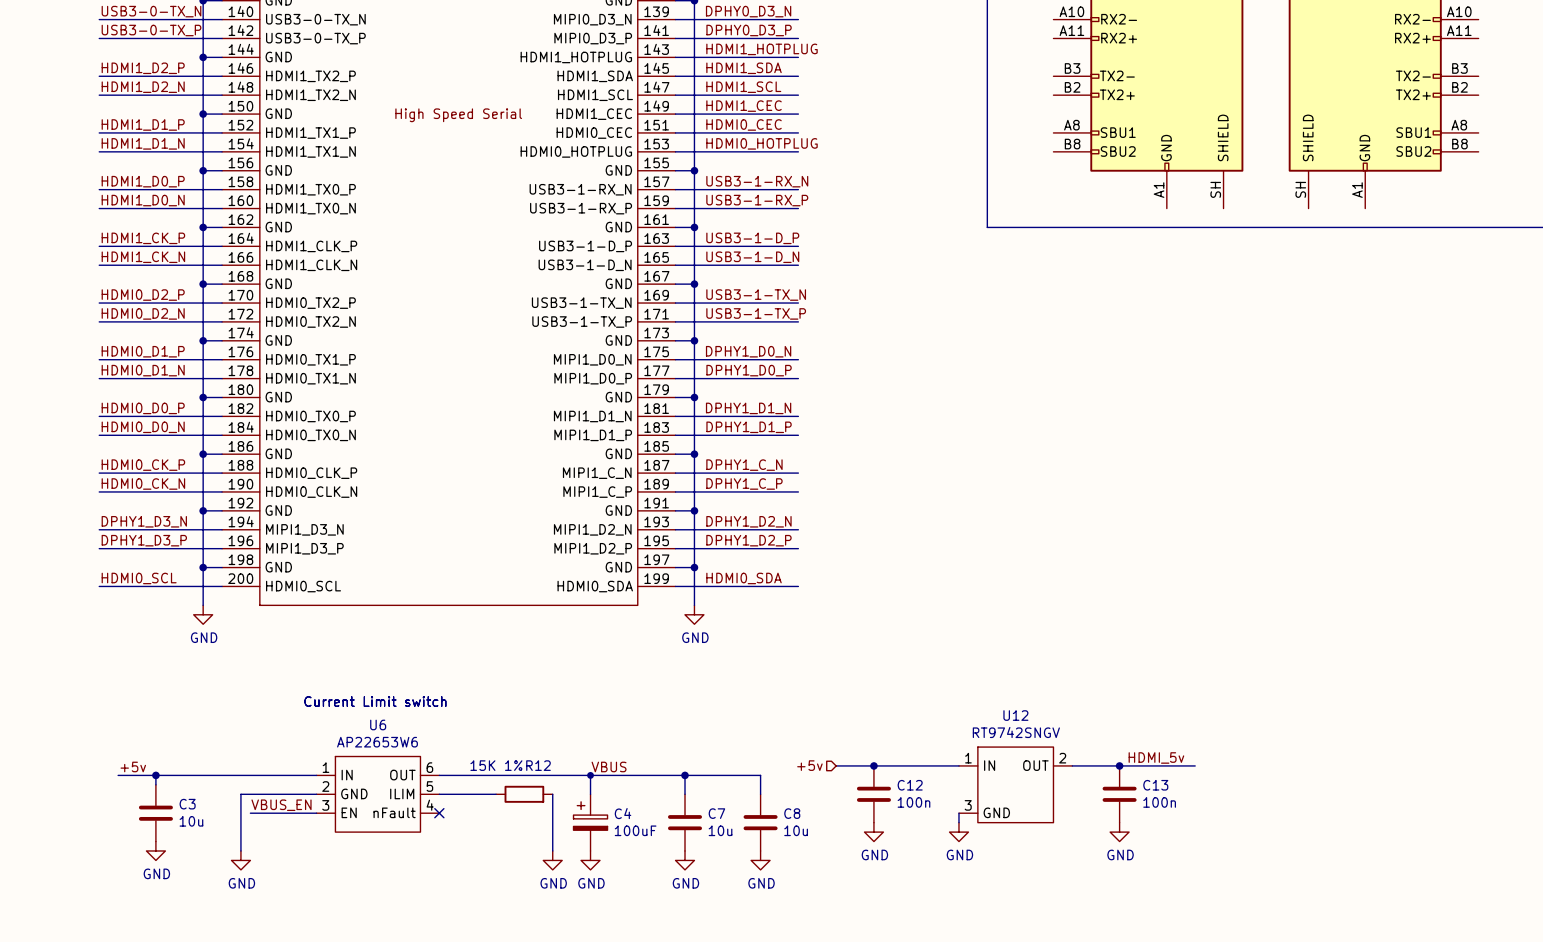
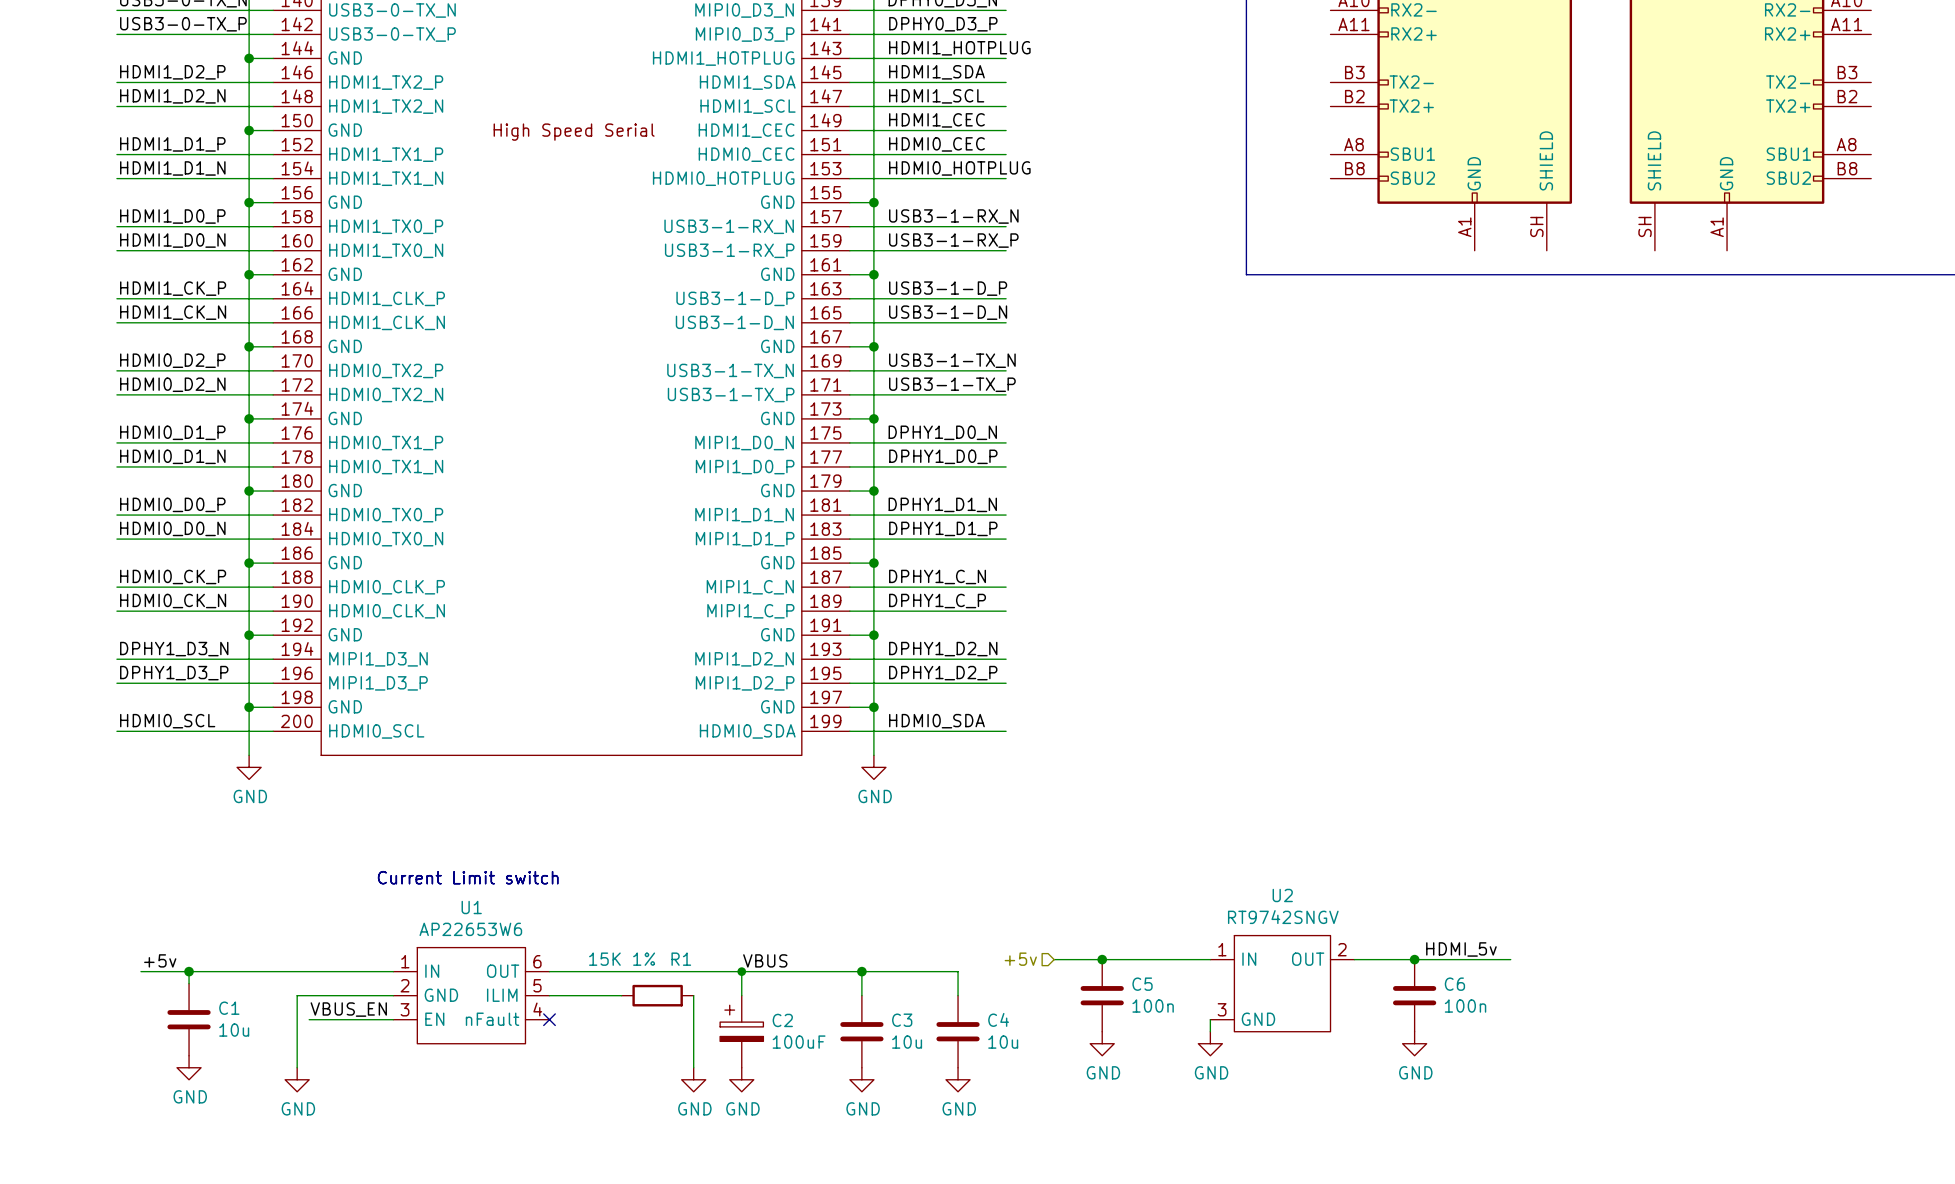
U12 name: U12 (1015, 715) -> U2 (1282, 895)
U6 name: U6 (378, 724) -> U1 (471, 907)
R12 name: R12 (538, 765) -> R1 (681, 959)
C12 name: C12 (910, 785) -> C5 (1142, 984)
C13 name: C13 (1155, 785) -> C6 (1454, 984)
C3 name: C3 (187, 804) -> C1 (229, 1008)
C4 name: C4 (623, 813) -> C2 (782, 1020)
C7 name: C7 (716, 813) -> C3 (902, 1020)
C8 name: C8 (792, 813) -> C4 (998, 1019)

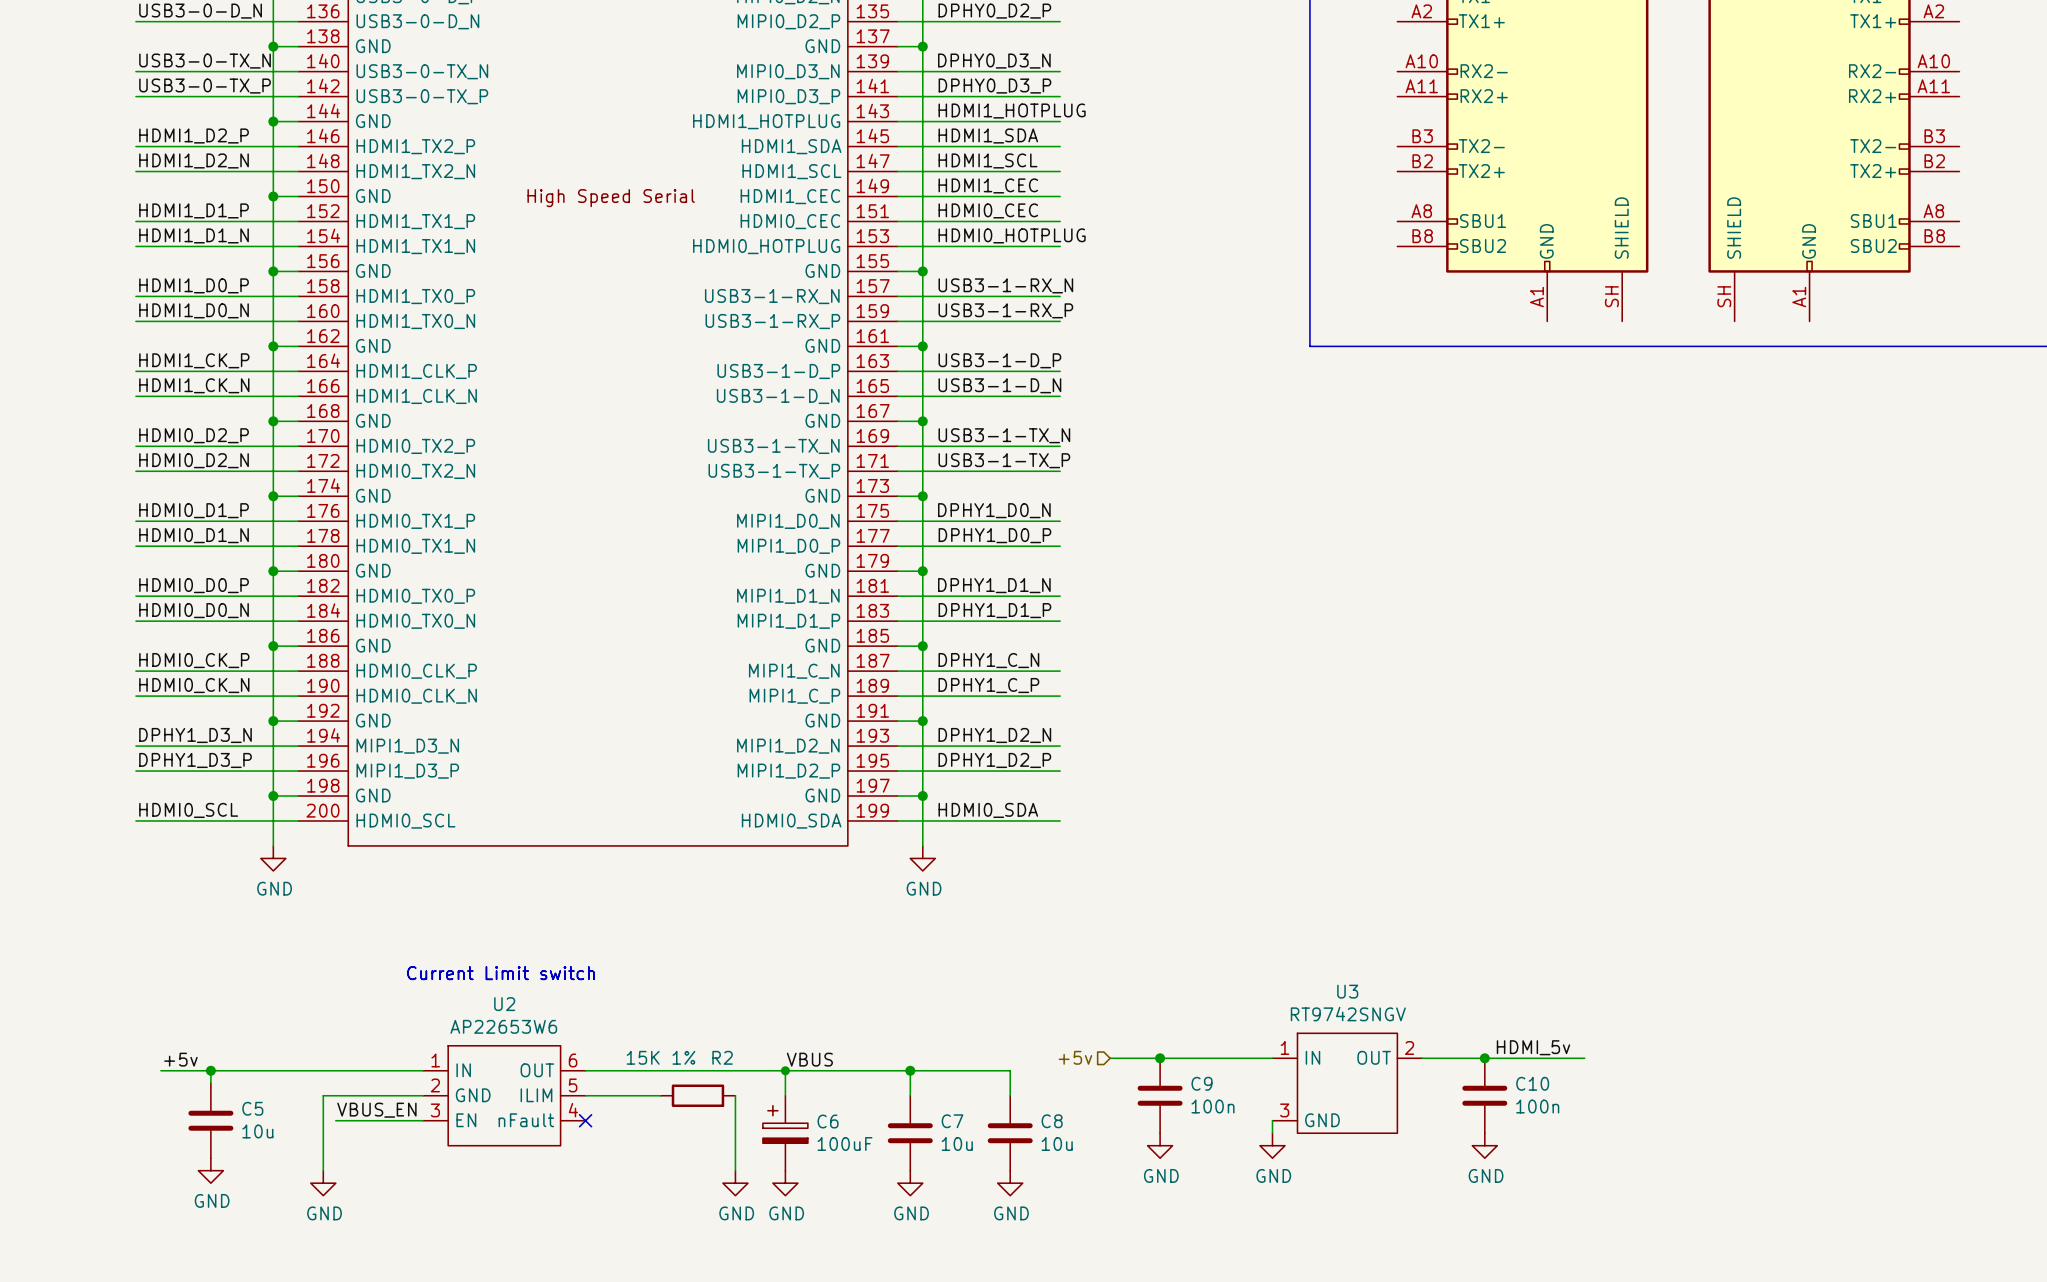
U2 name: U2 (1282, 895) -> U3 (1347, 991)
U1 name: U1 (471, 907) -> U2 (504, 1004)
R1 name: R1 (681, 959) -> R2 (722, 1057)
C5 name: C5 (1142, 984) -> C9 (1201, 1083)
C6 name: C6 (1454, 984) -> C10 (1532, 1083)
C1 name: C1 (229, 1008) -> C5 (252, 1108)
C4 name: C4 (998, 1019) -> C8 (1052, 1121)
C2 name: C2 (782, 1020) -> C6 (828, 1121)
C3 name: C3 (902, 1020) -> C7 (952, 1121)

